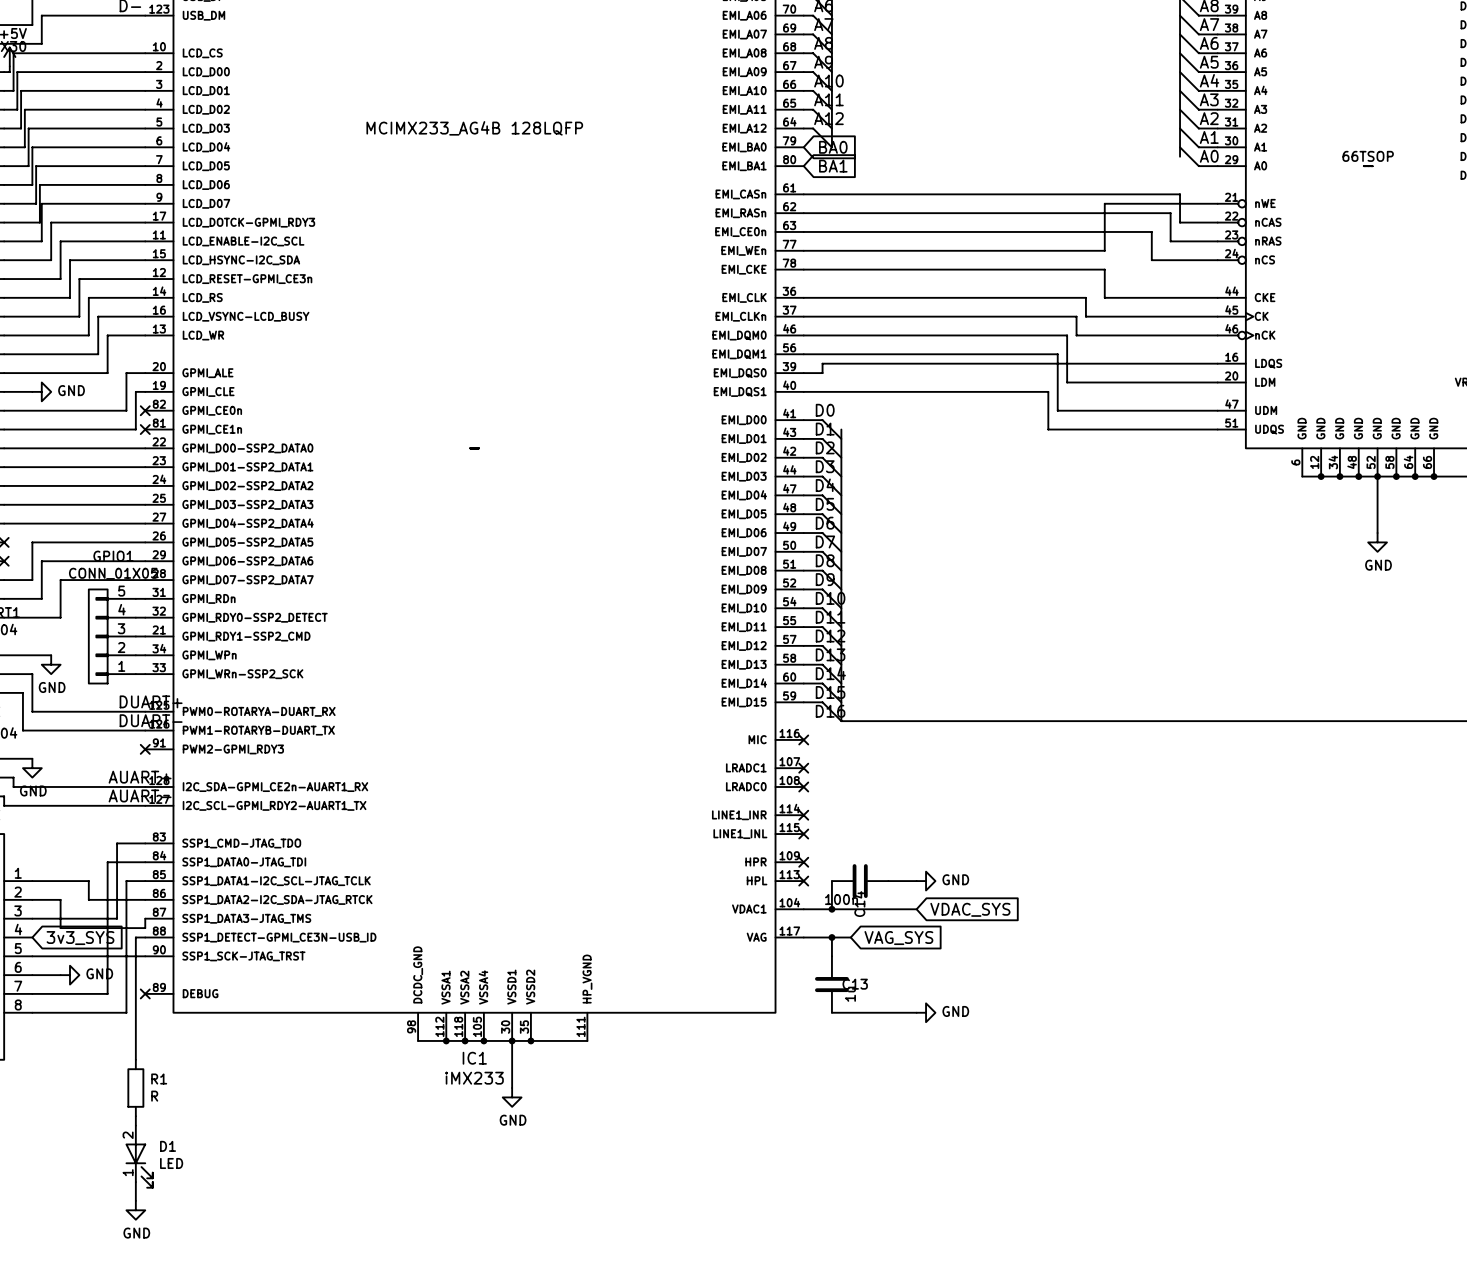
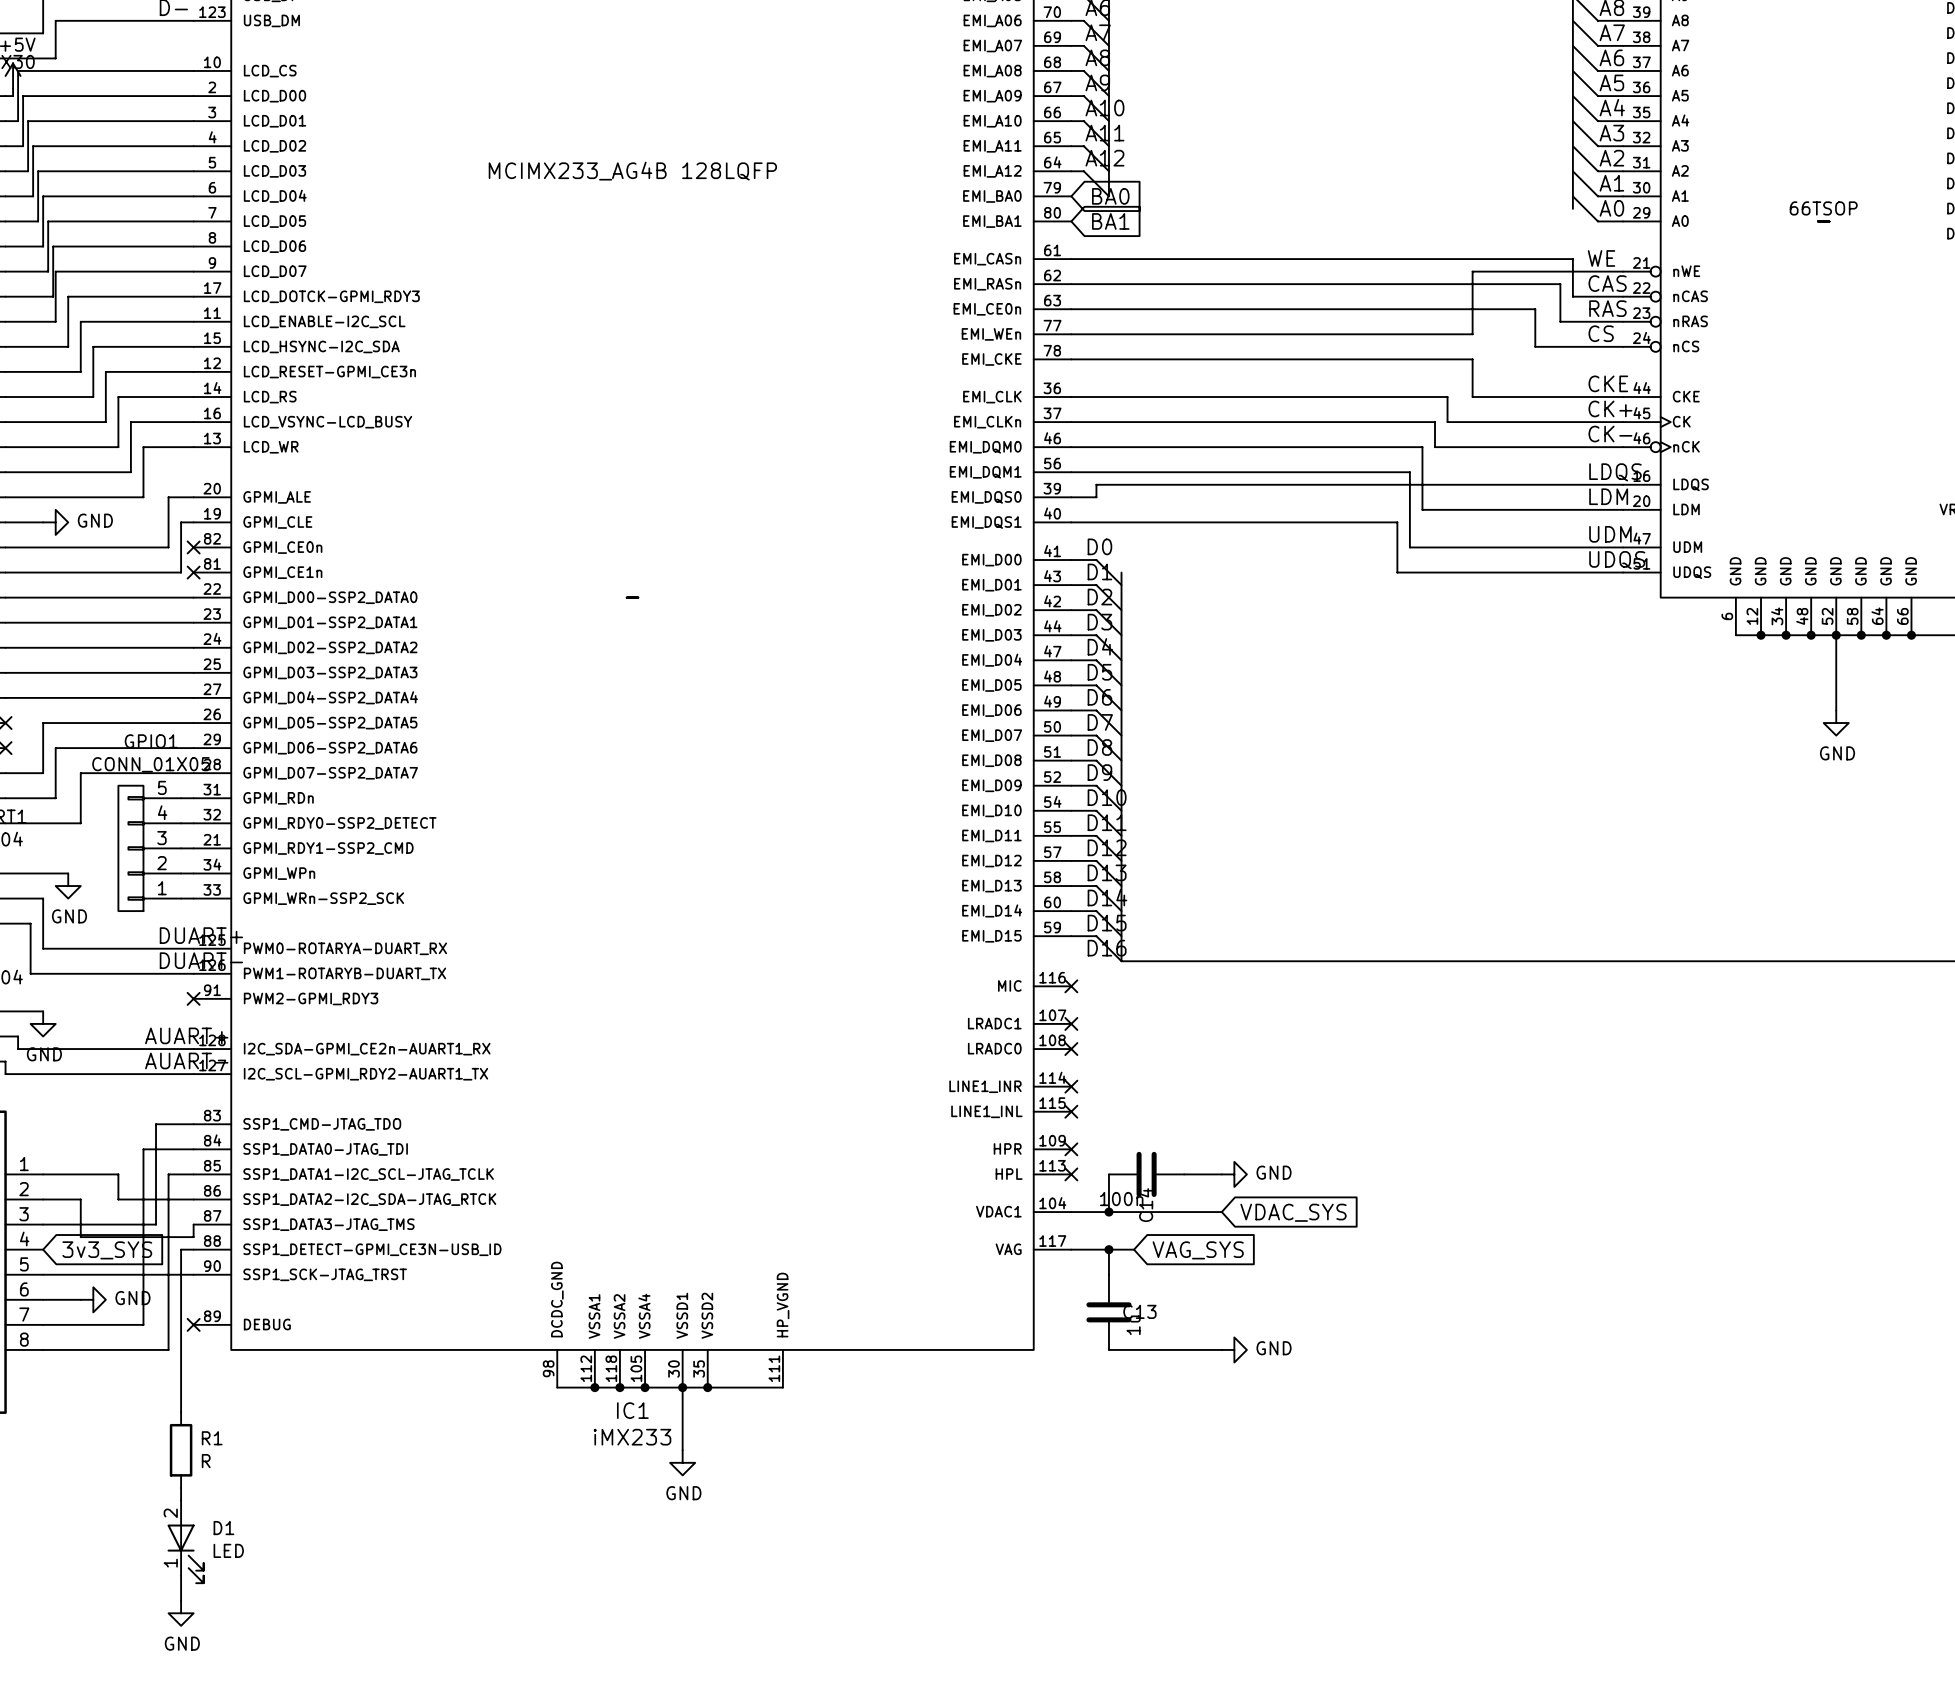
label: none -> WE (1601, 258)
label: none -> CAS (1607, 283)
label: none -> RAS (1607, 308)
label: none -> CS (1601, 333)
label: none -> CKE (1608, 383)
label: none -> CK+ (1610, 408)
label: none -> CK- (1610, 434)
label: none -> LDQS (1615, 472)
label: none -> LDM (1608, 496)
label: none -> UDM (1610, 534)
label: none -> UDQS (1617, 560)

